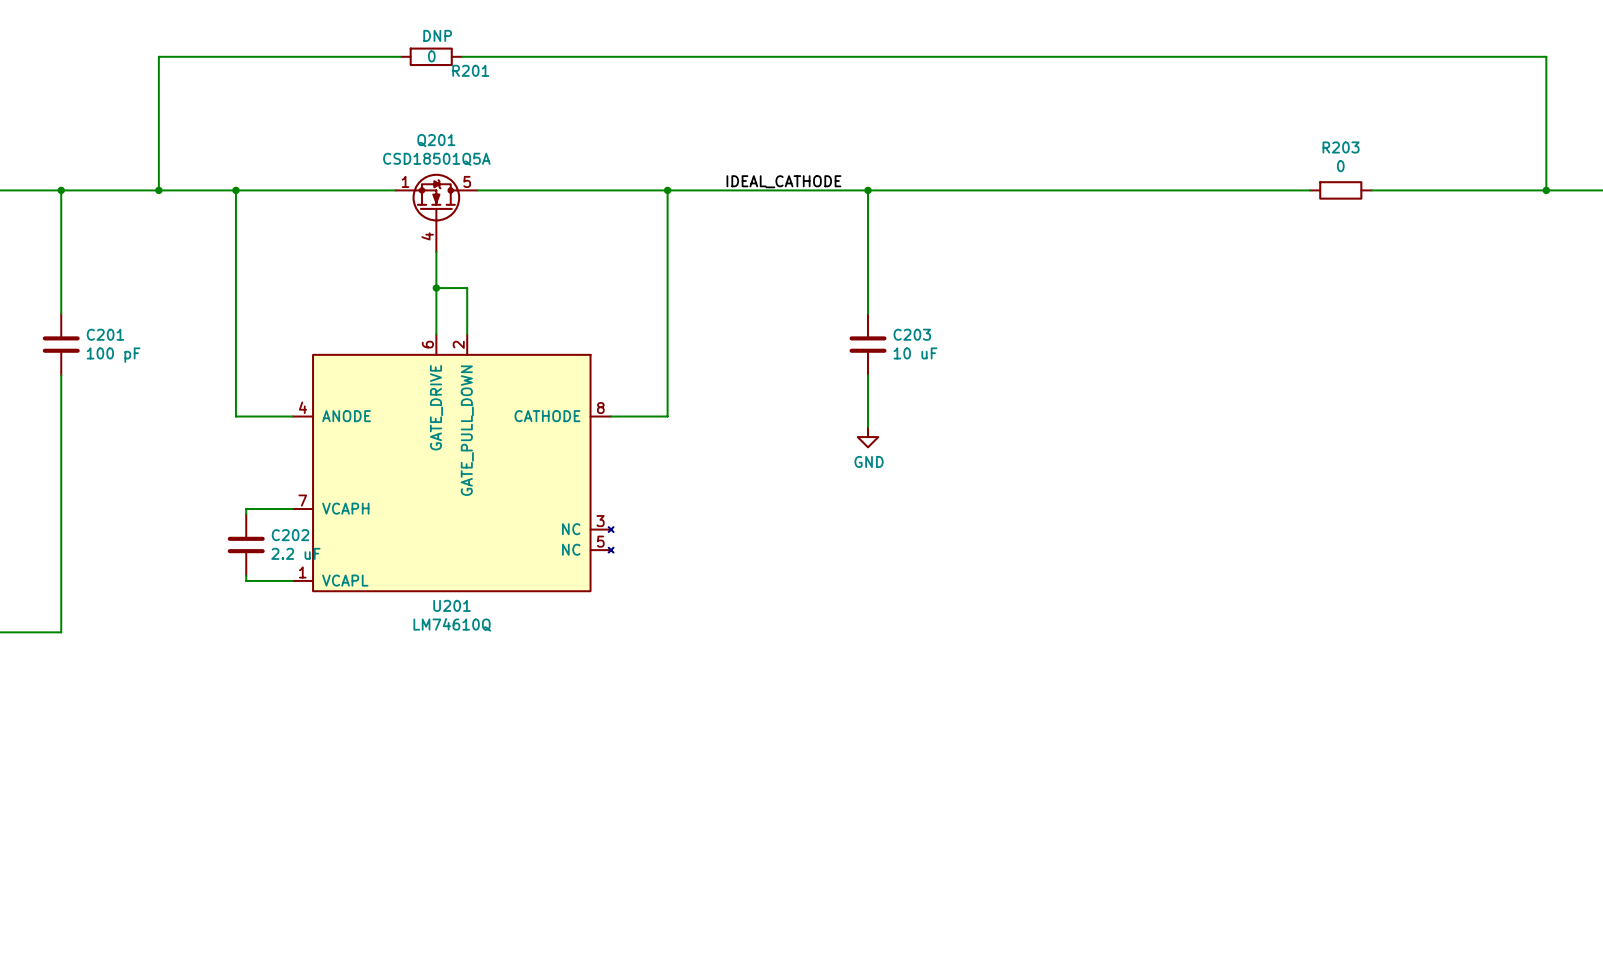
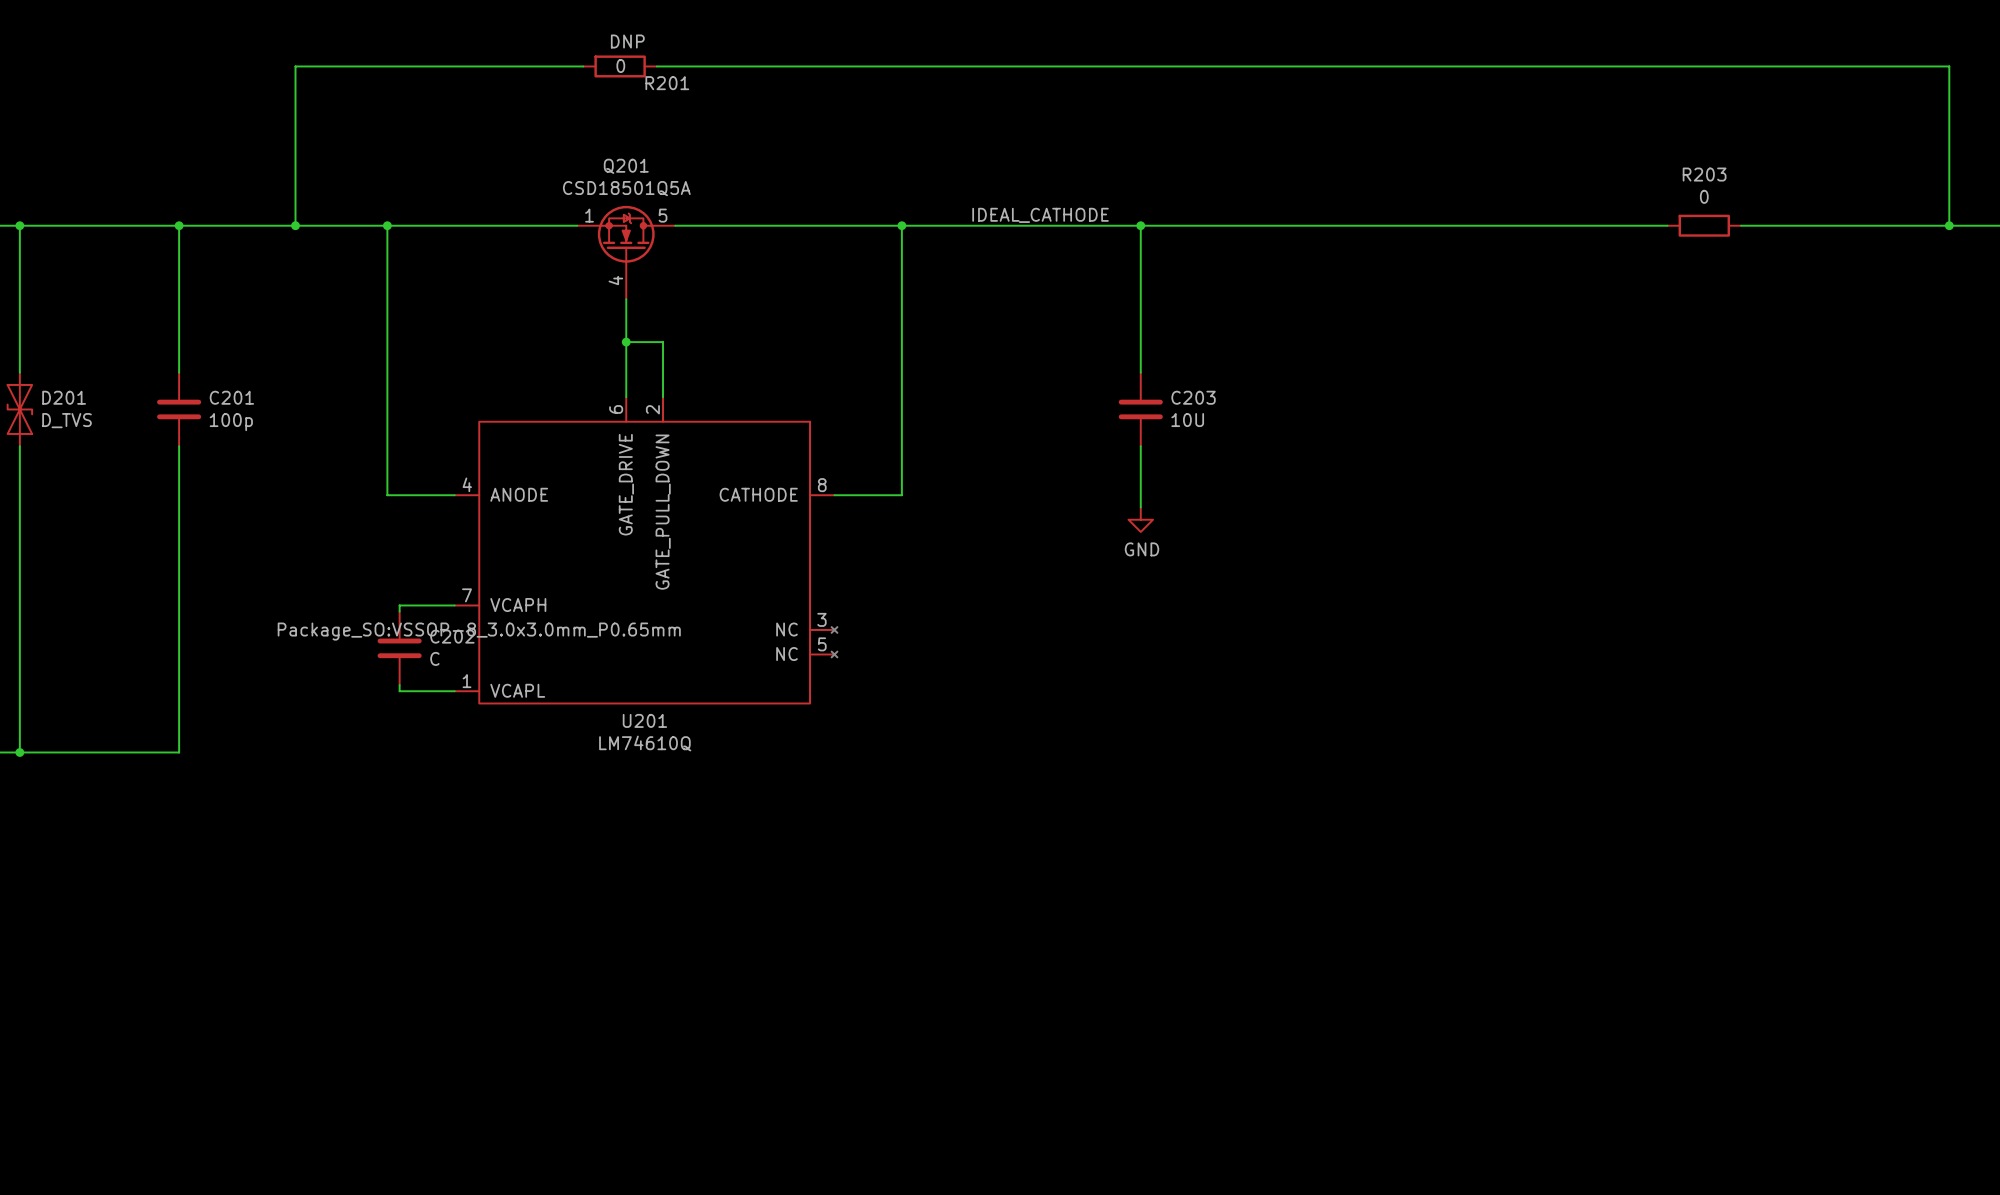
C203 value: 10 uF (915, 353) -> 10U (1187, 420)
C201 value: 100 pF (113, 355) -> 100p (231, 422)
U201 text: none -> Package_SO:VSSOP-8_3.0x3.0mm_P0.65mm (479, 631)
C202 value: 2.2 uF (295, 553) -> C (434, 658)

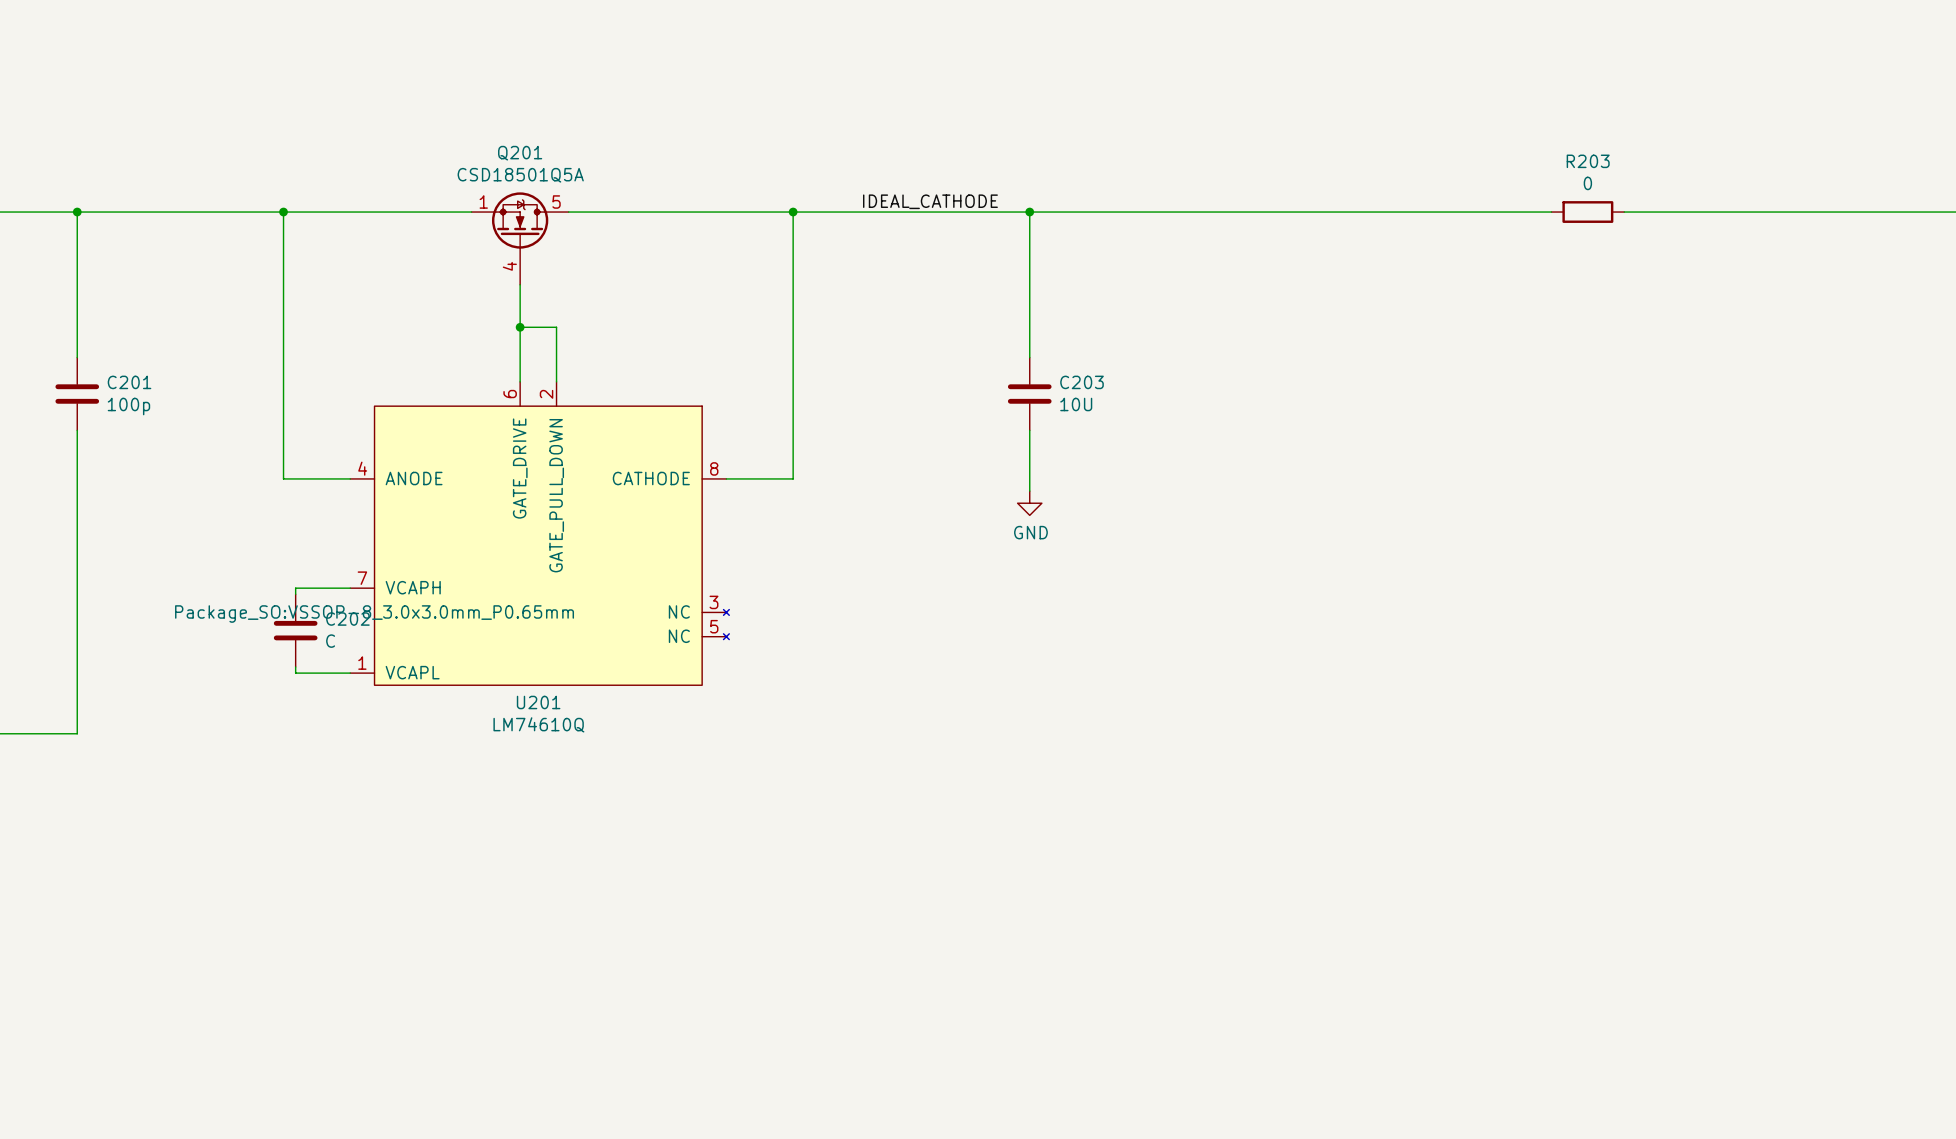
wire: (583, 66) (295, 66) (295, 225) -> none
R201: 0 (620, 66) -> none
wire: (656, 66) (1949, 66) (1949, 225) -> none
junction: (295, 225) -> none
junction: (1949, 225) -> none

